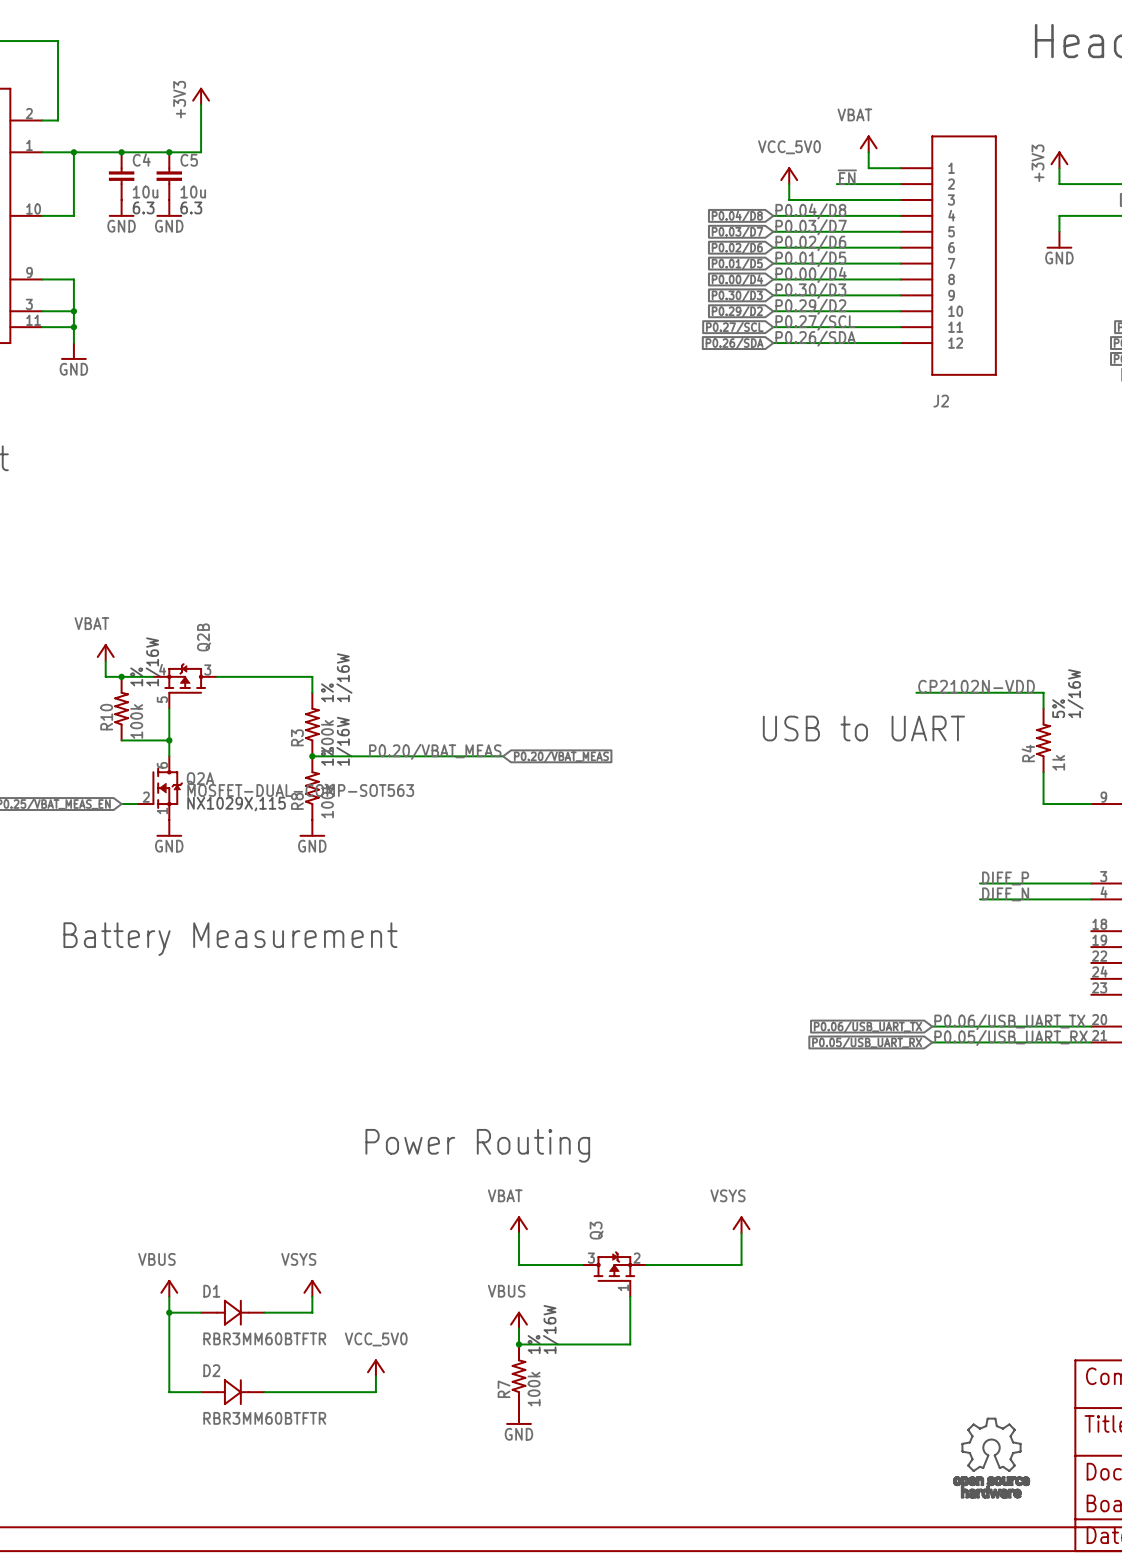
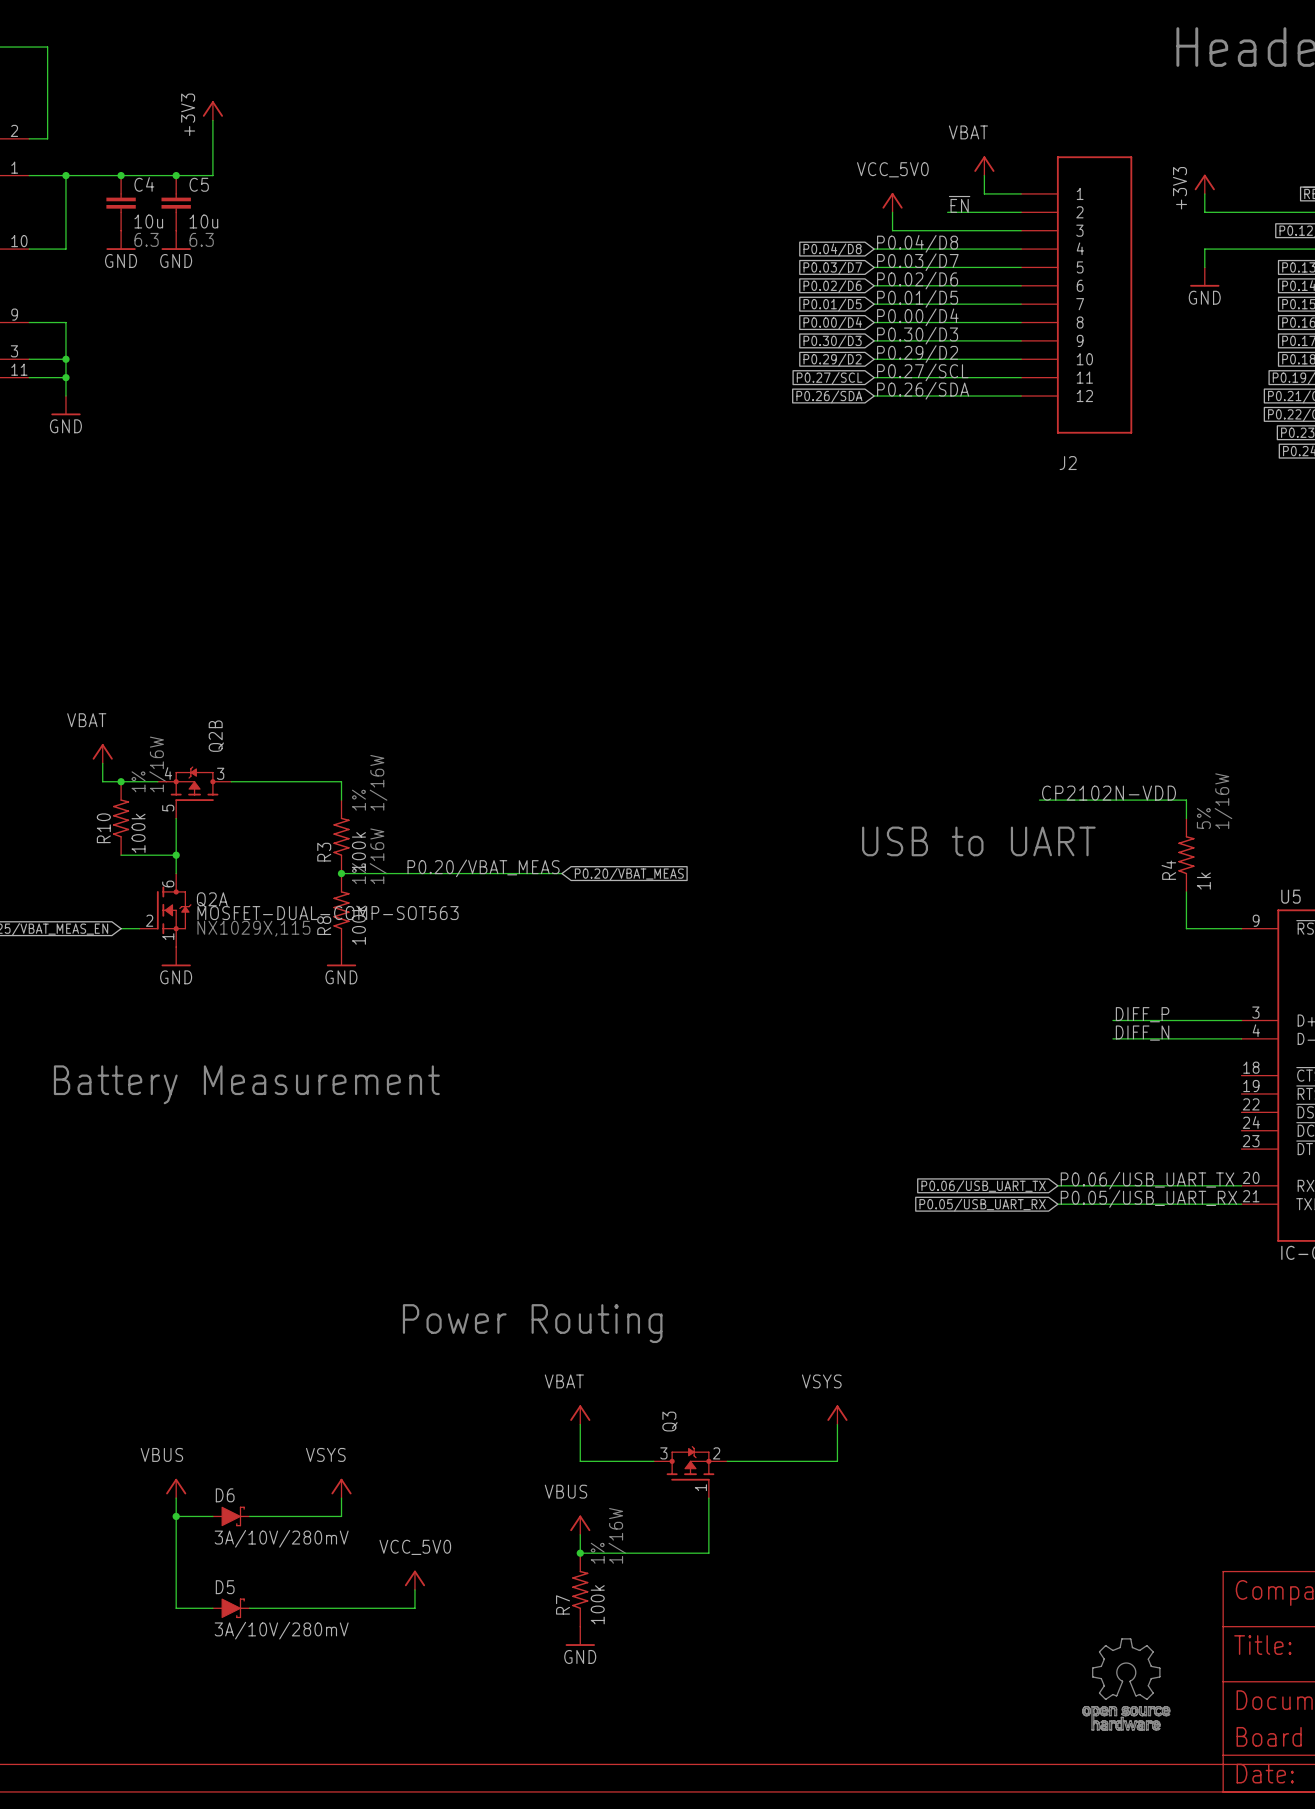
D6: none -> 3A/10V/280mV (231, 1516)
D1: (232, 1312) -> none
D5: none -> 3A/10V/280mV (231, 1608)
D2: (232, 1392) -> none

